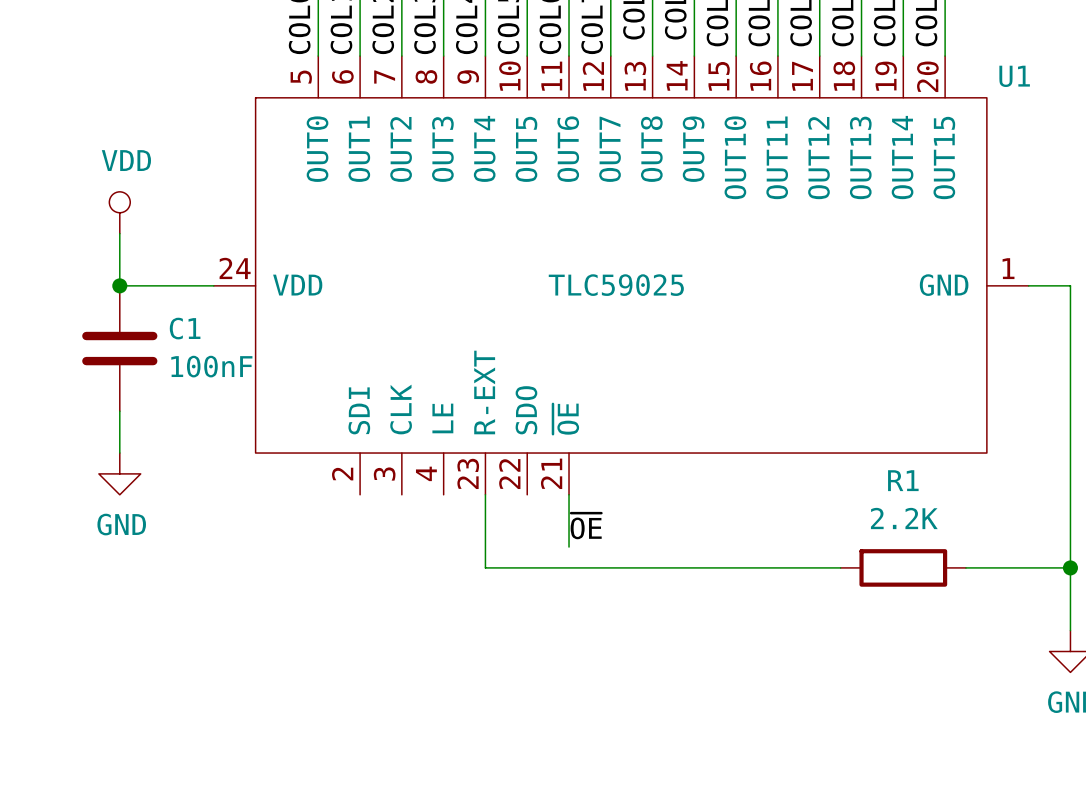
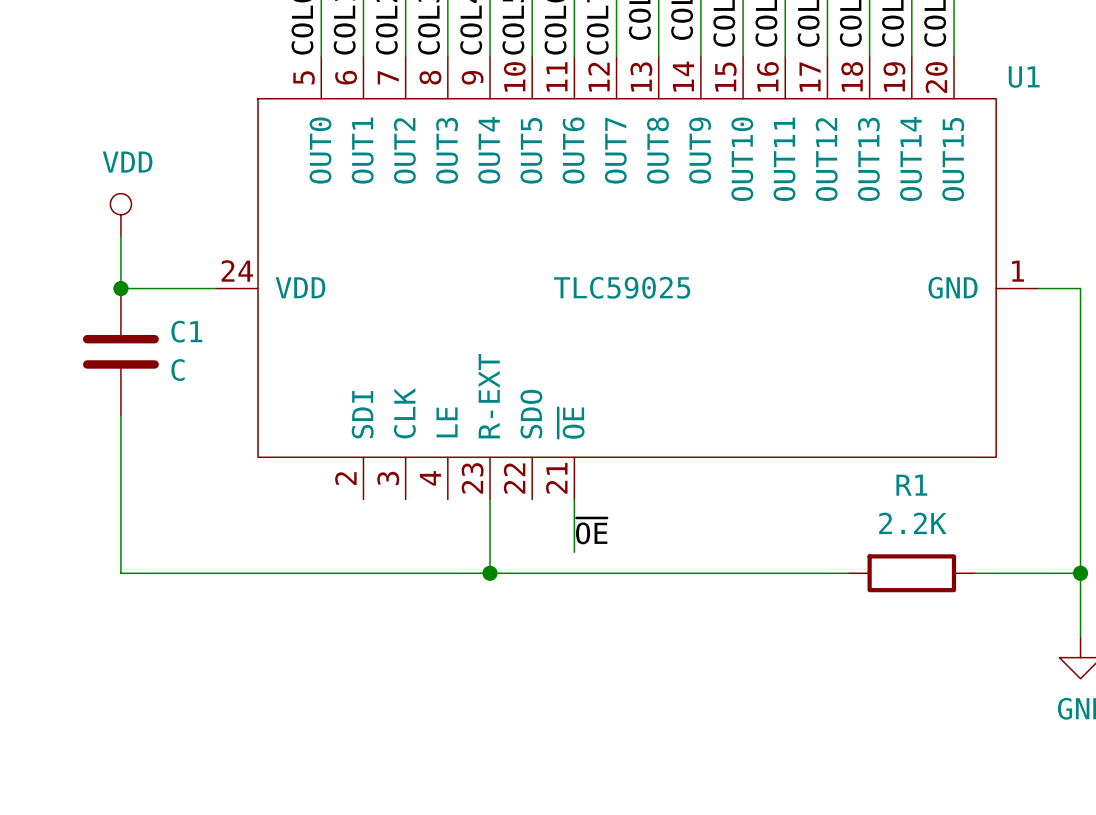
C1 value: 100nF (211, 366) -> C (177, 370)
wire: none -> (120, 457) (120, 573) (490, 573)
power symbol: GND (119, 473) -> none
junction: none -> (490, 573)

